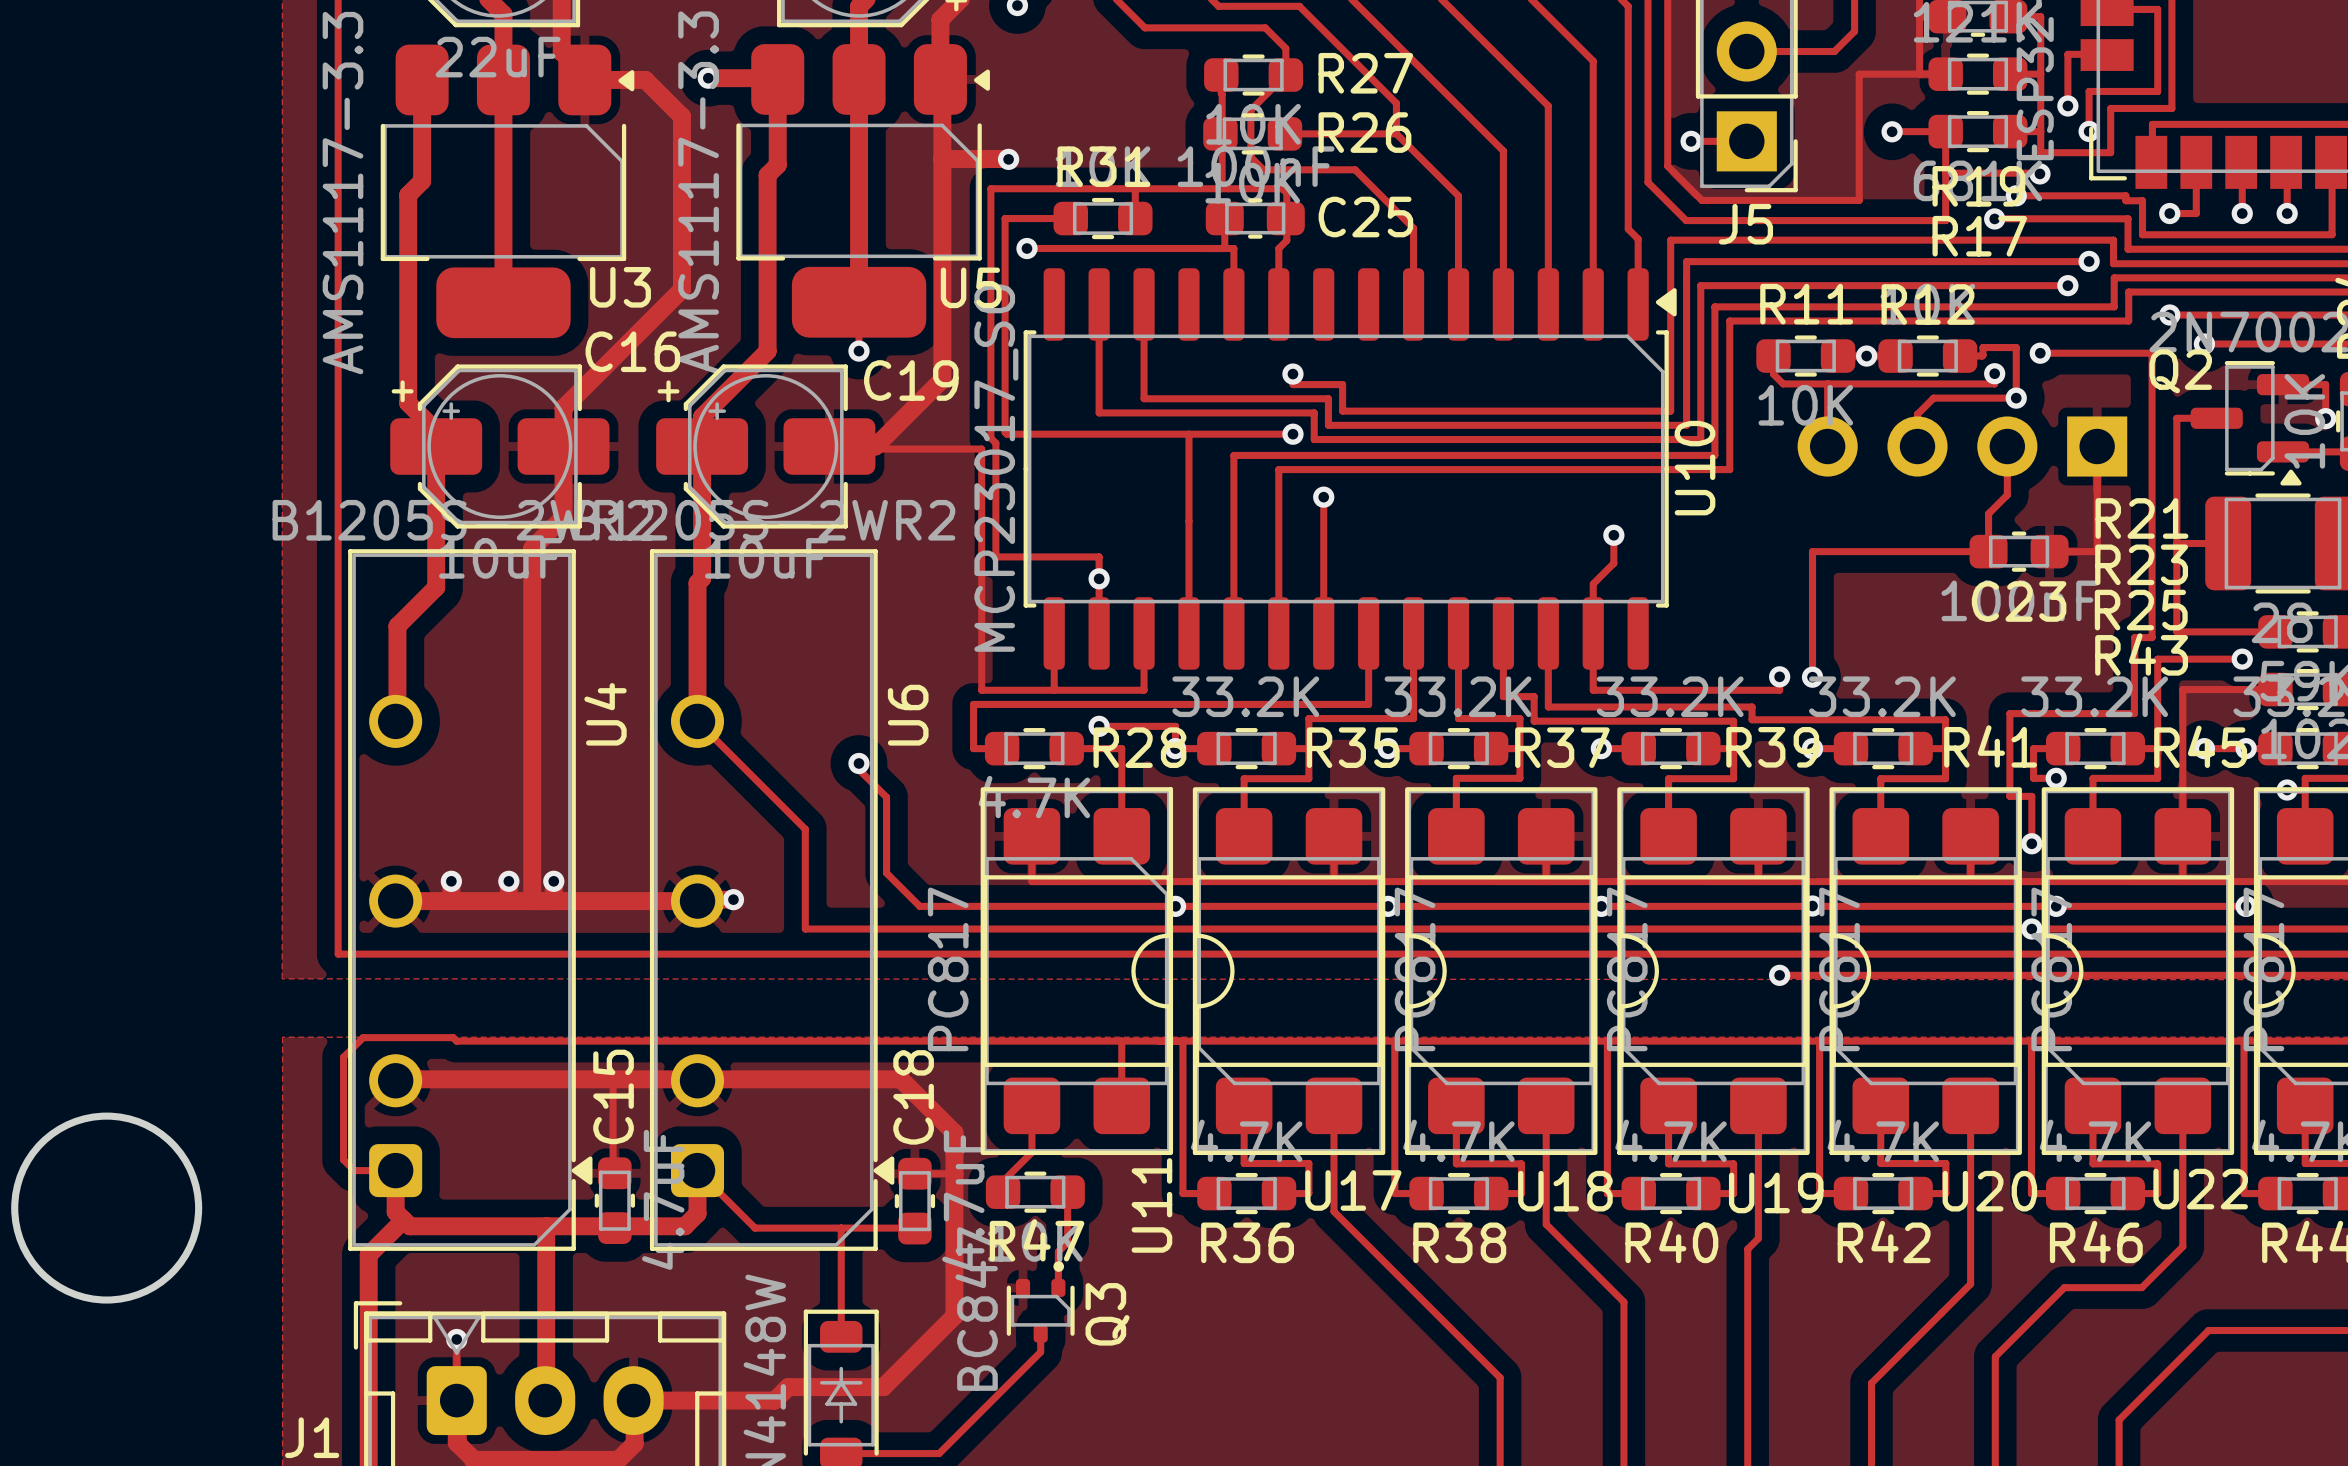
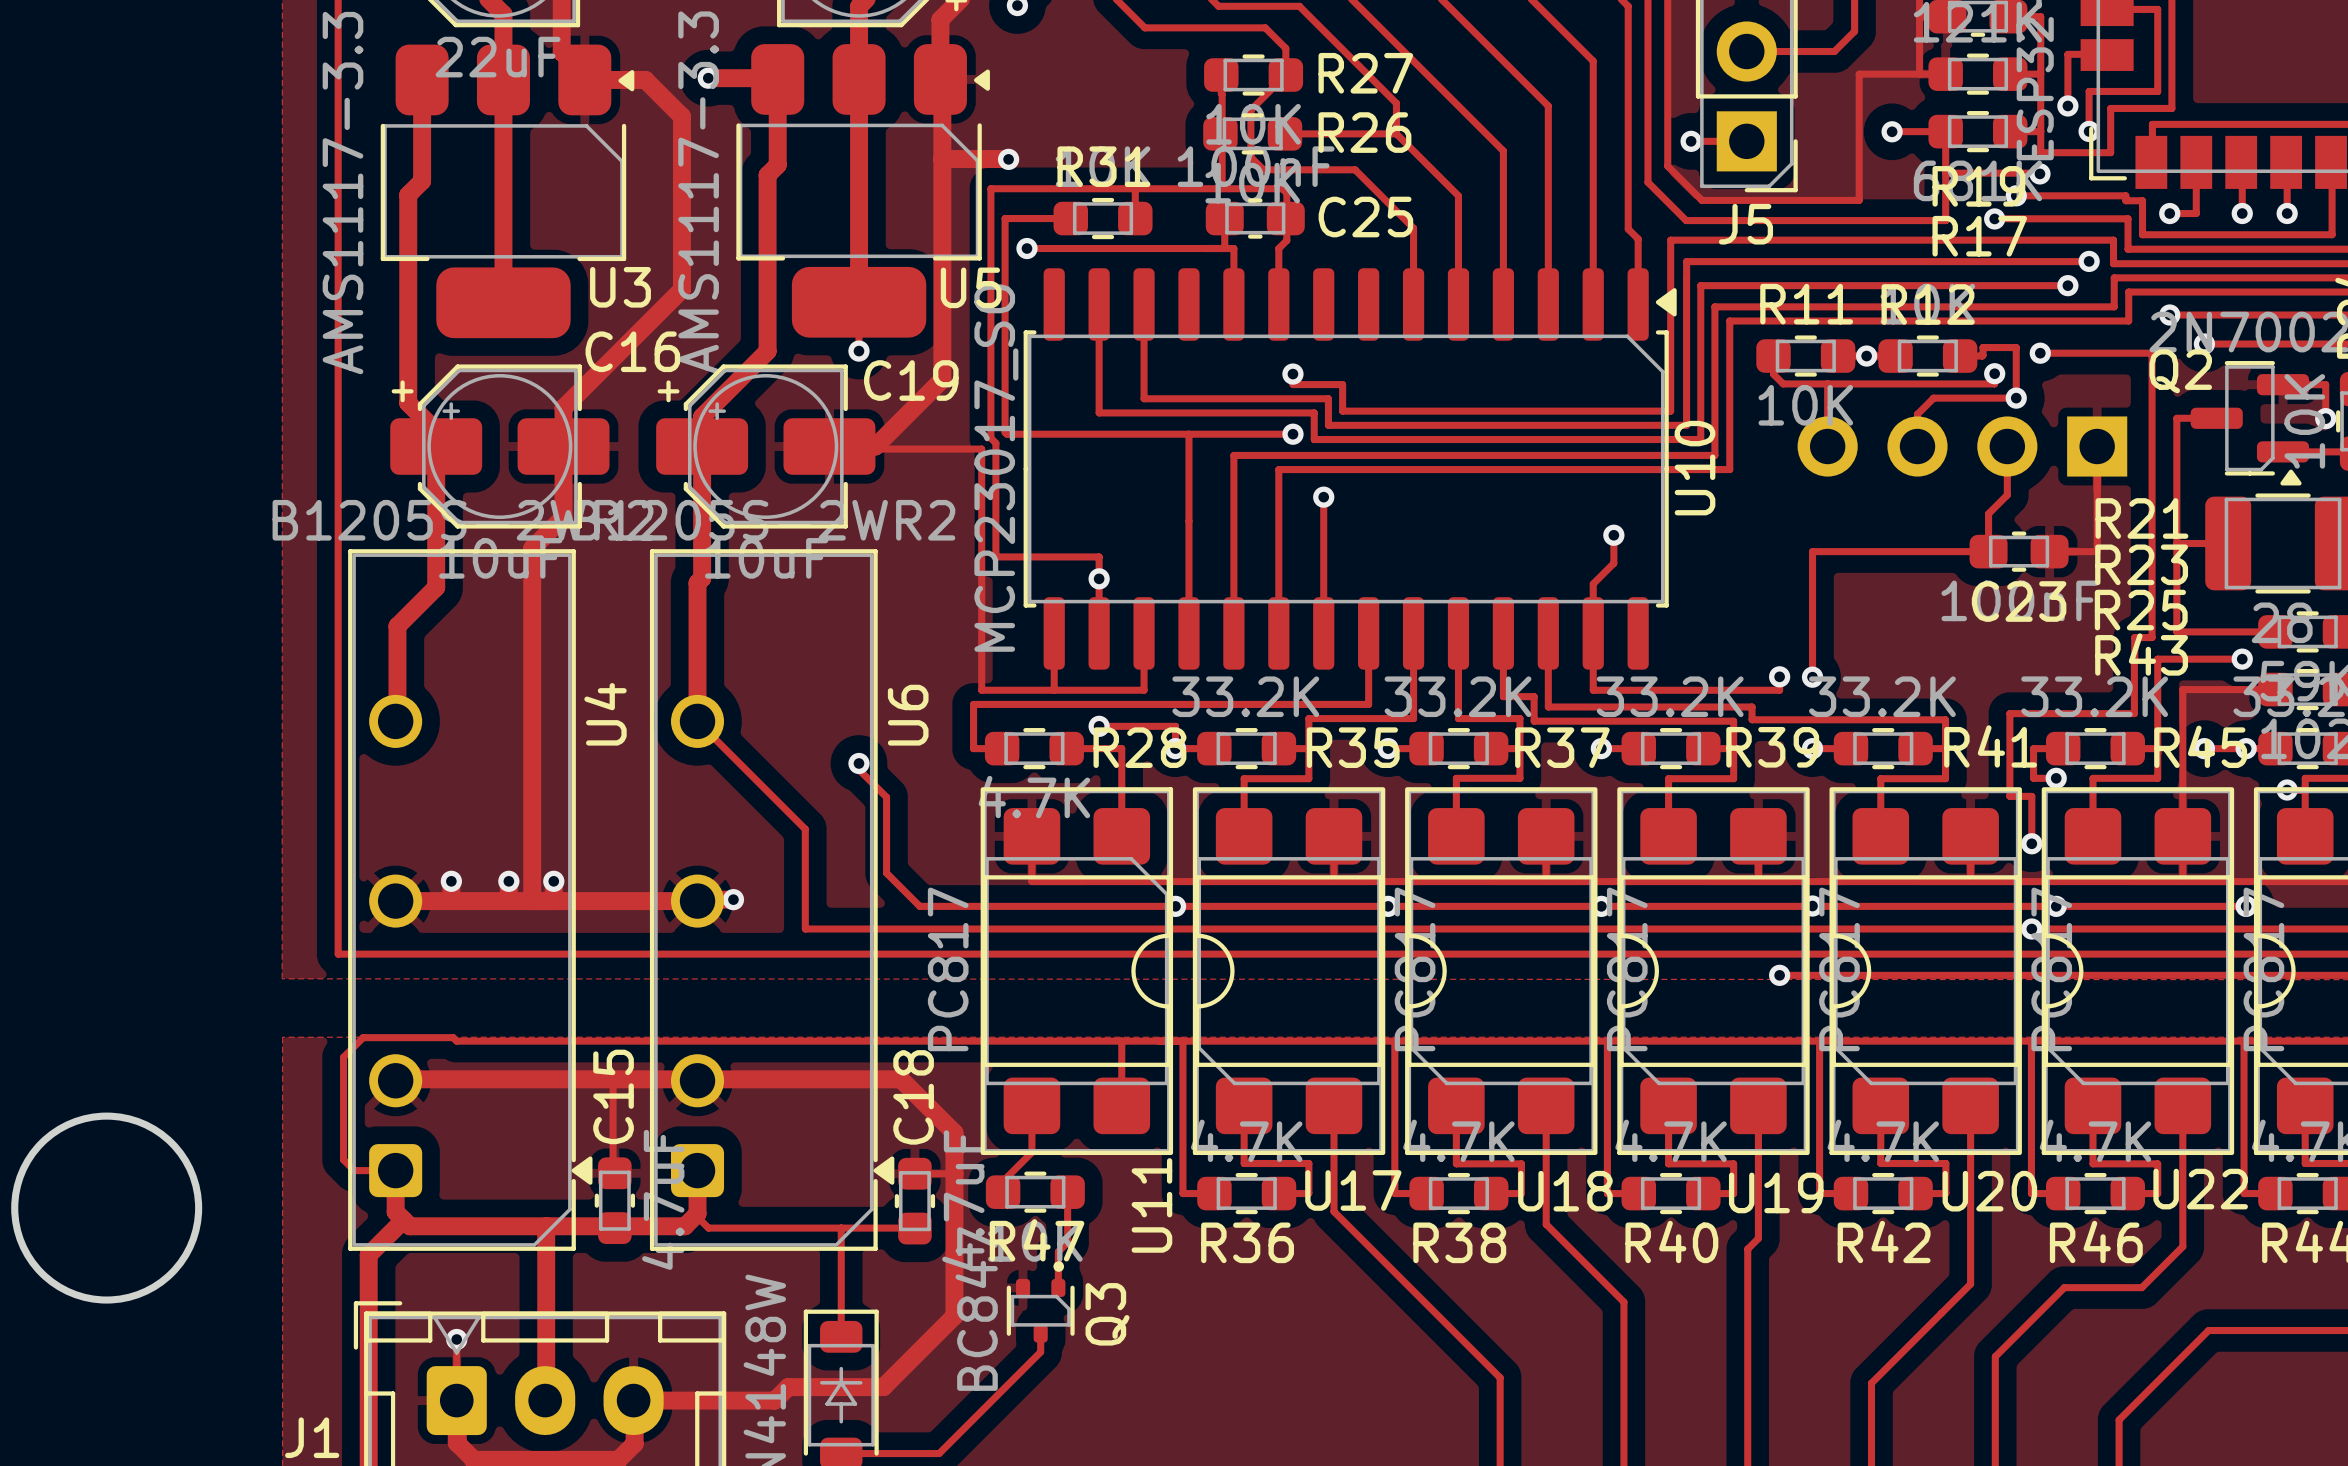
track: (697, 1170) (755, 1228) -> (697, 1170) (697, 1217) (708, 1228) (755, 1228)

